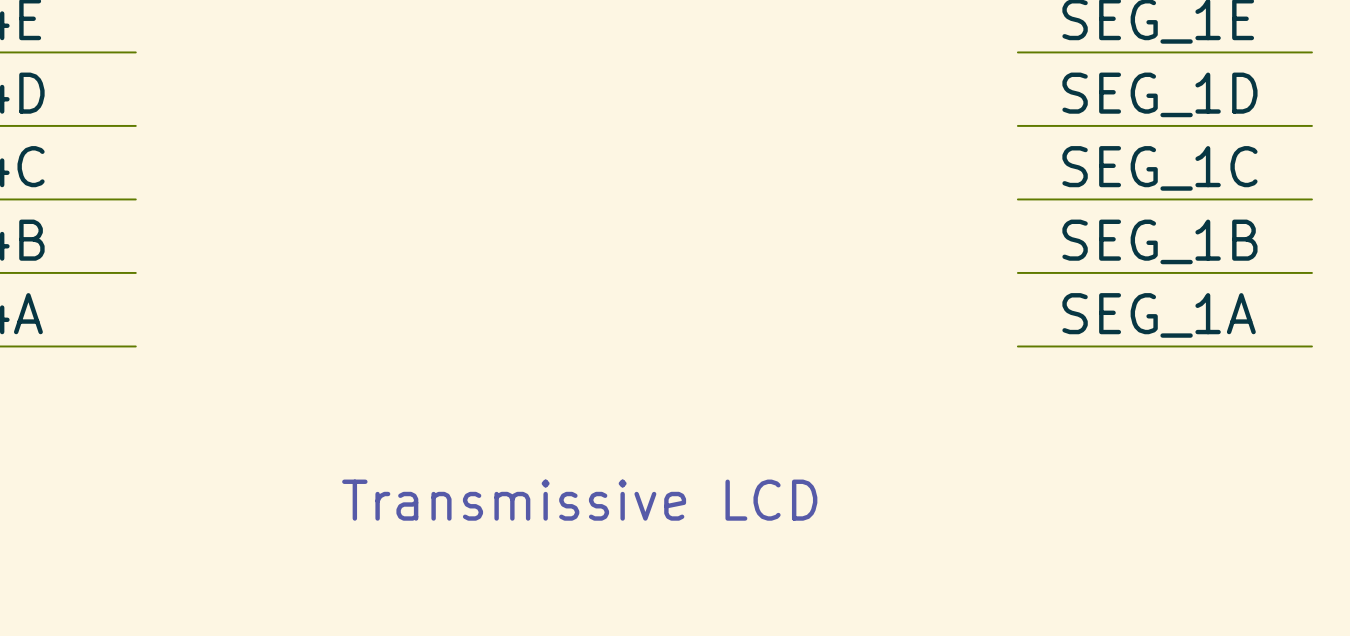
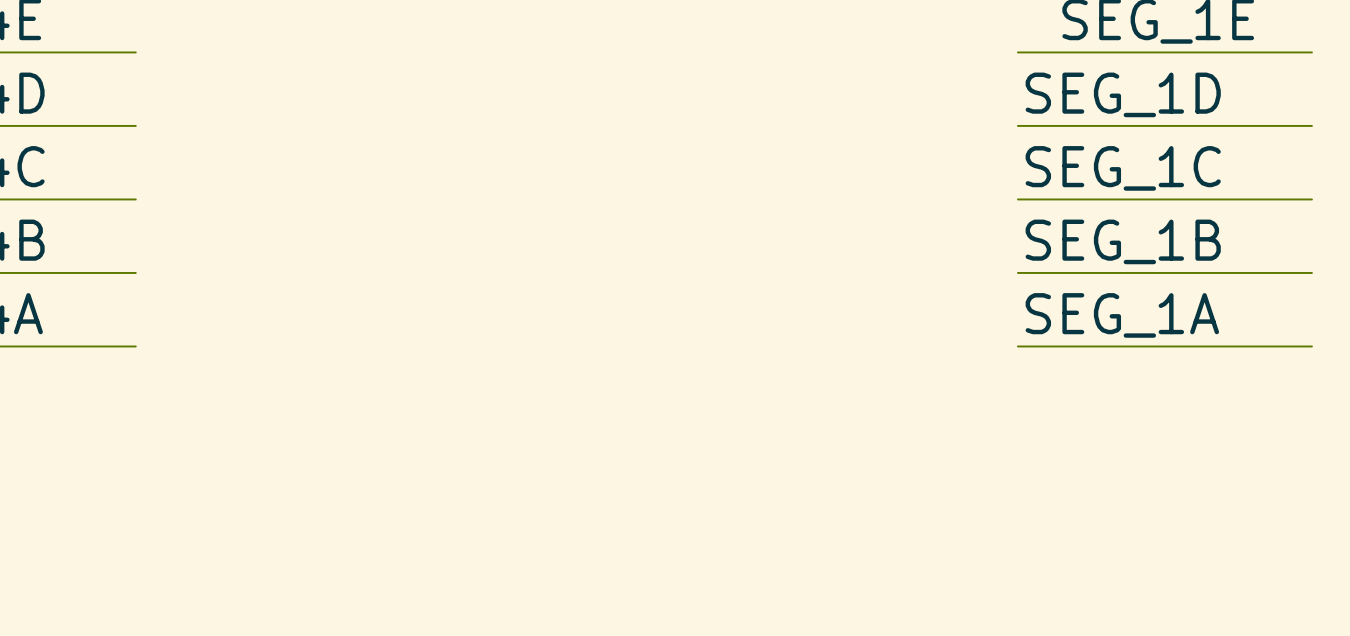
label position: SEG_1D (1159, 94) -> SEG_1D (1123, 94)
label position: SEG_1C (1159, 168) -> SEG_1C (1123, 168)
label position: SEG_1B (1159, 241) -> SEG_1B (1123, 241)
label position: SEG_1A (1159, 315) -> SEG_1A (1122, 315)
text: Transmissive LCD (579, 500) -> none

